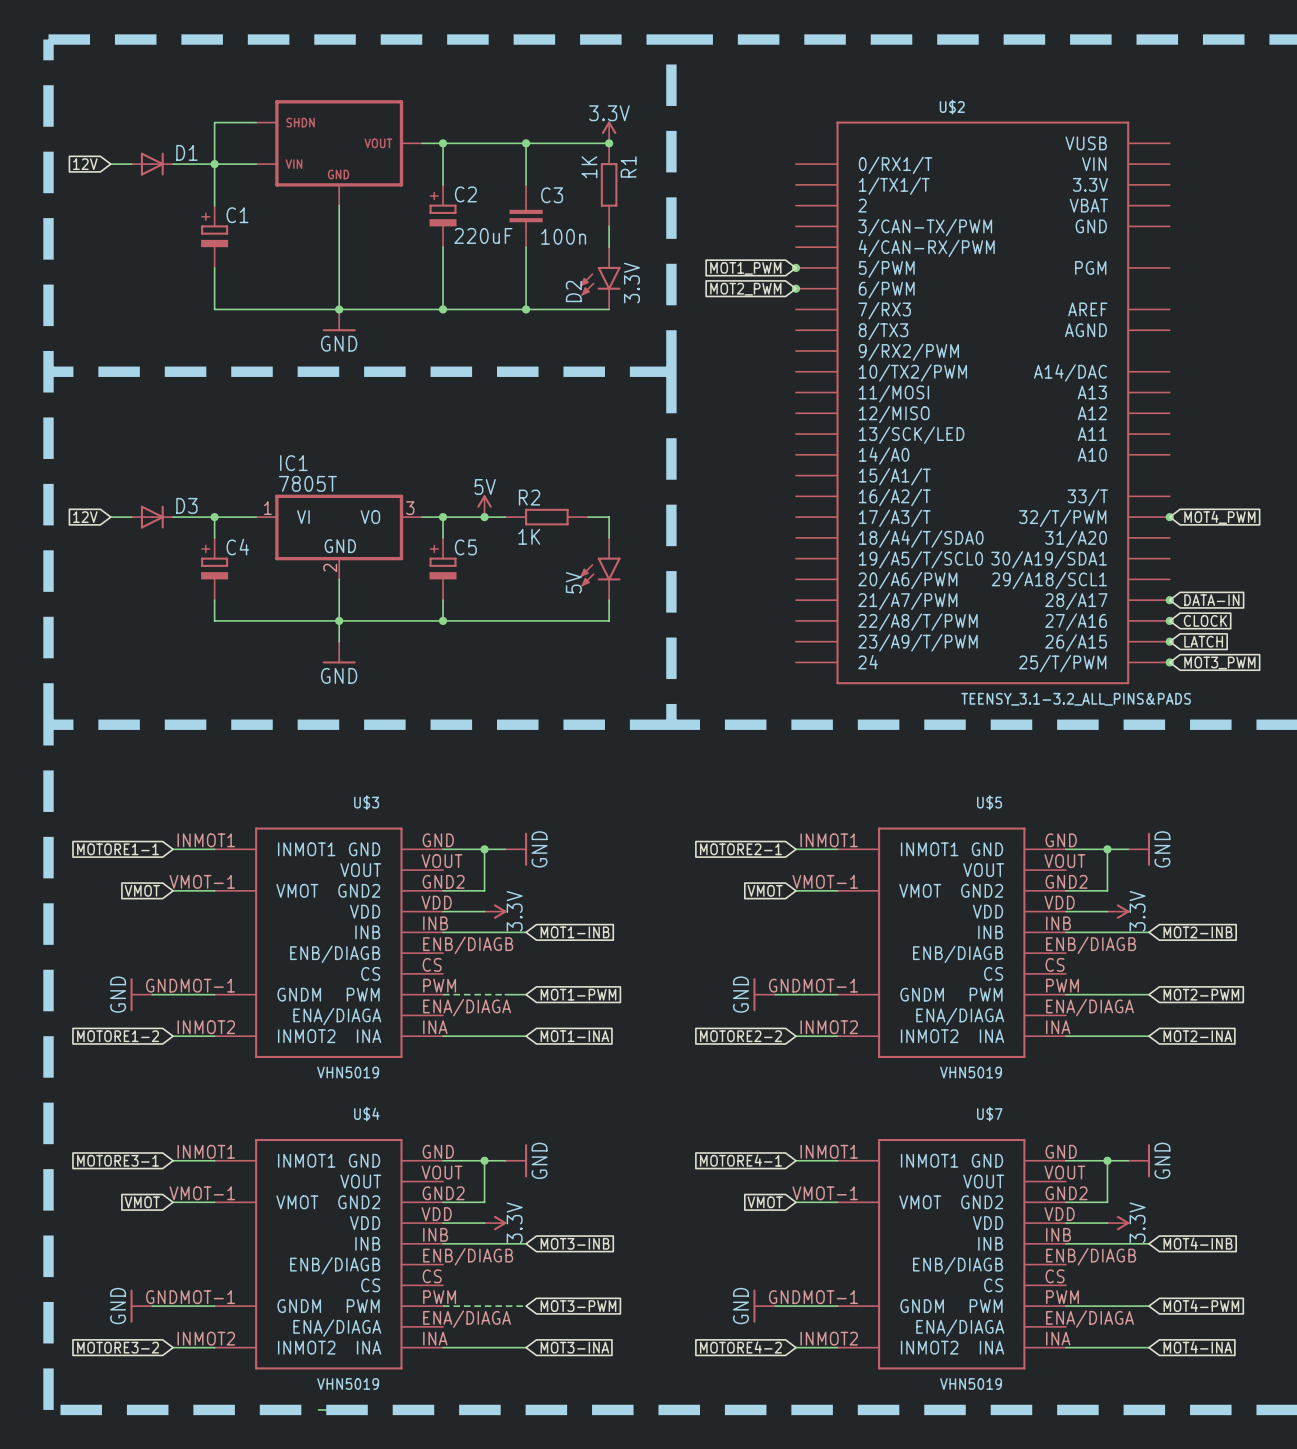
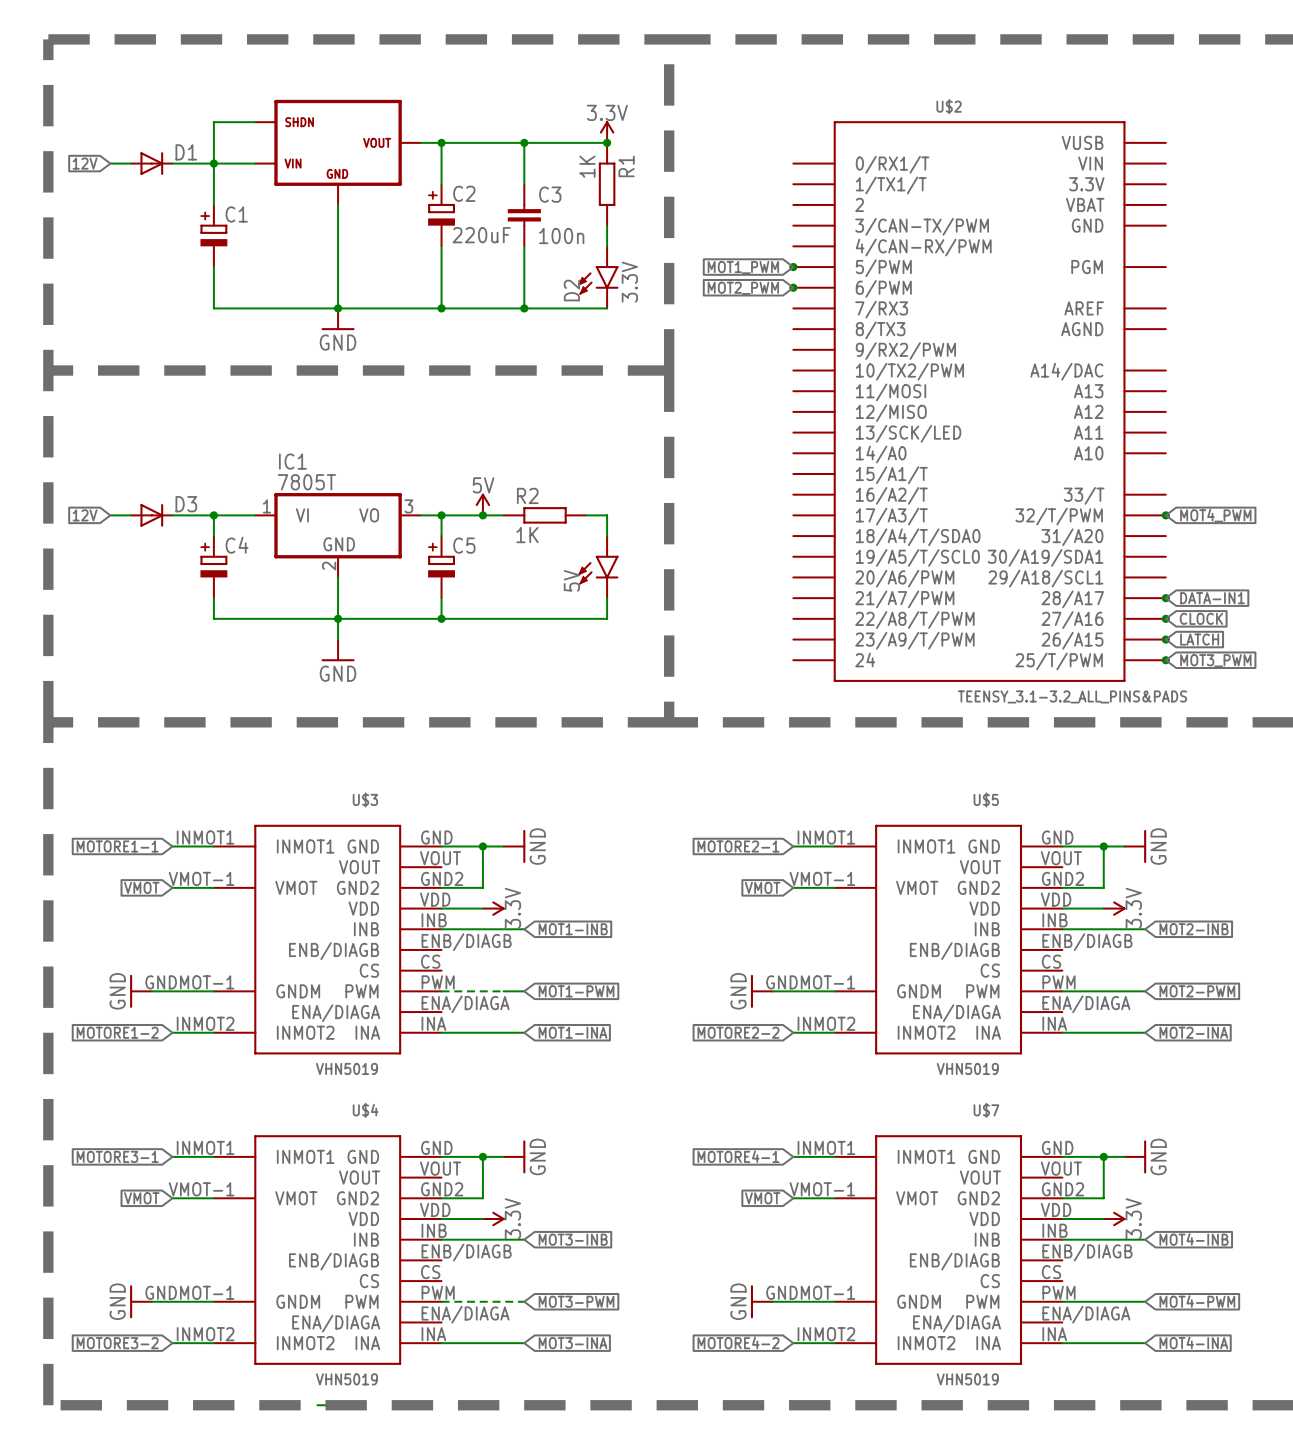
global label: DATA-IN (1211, 600) -> DATA-IN1 (1212, 598)

